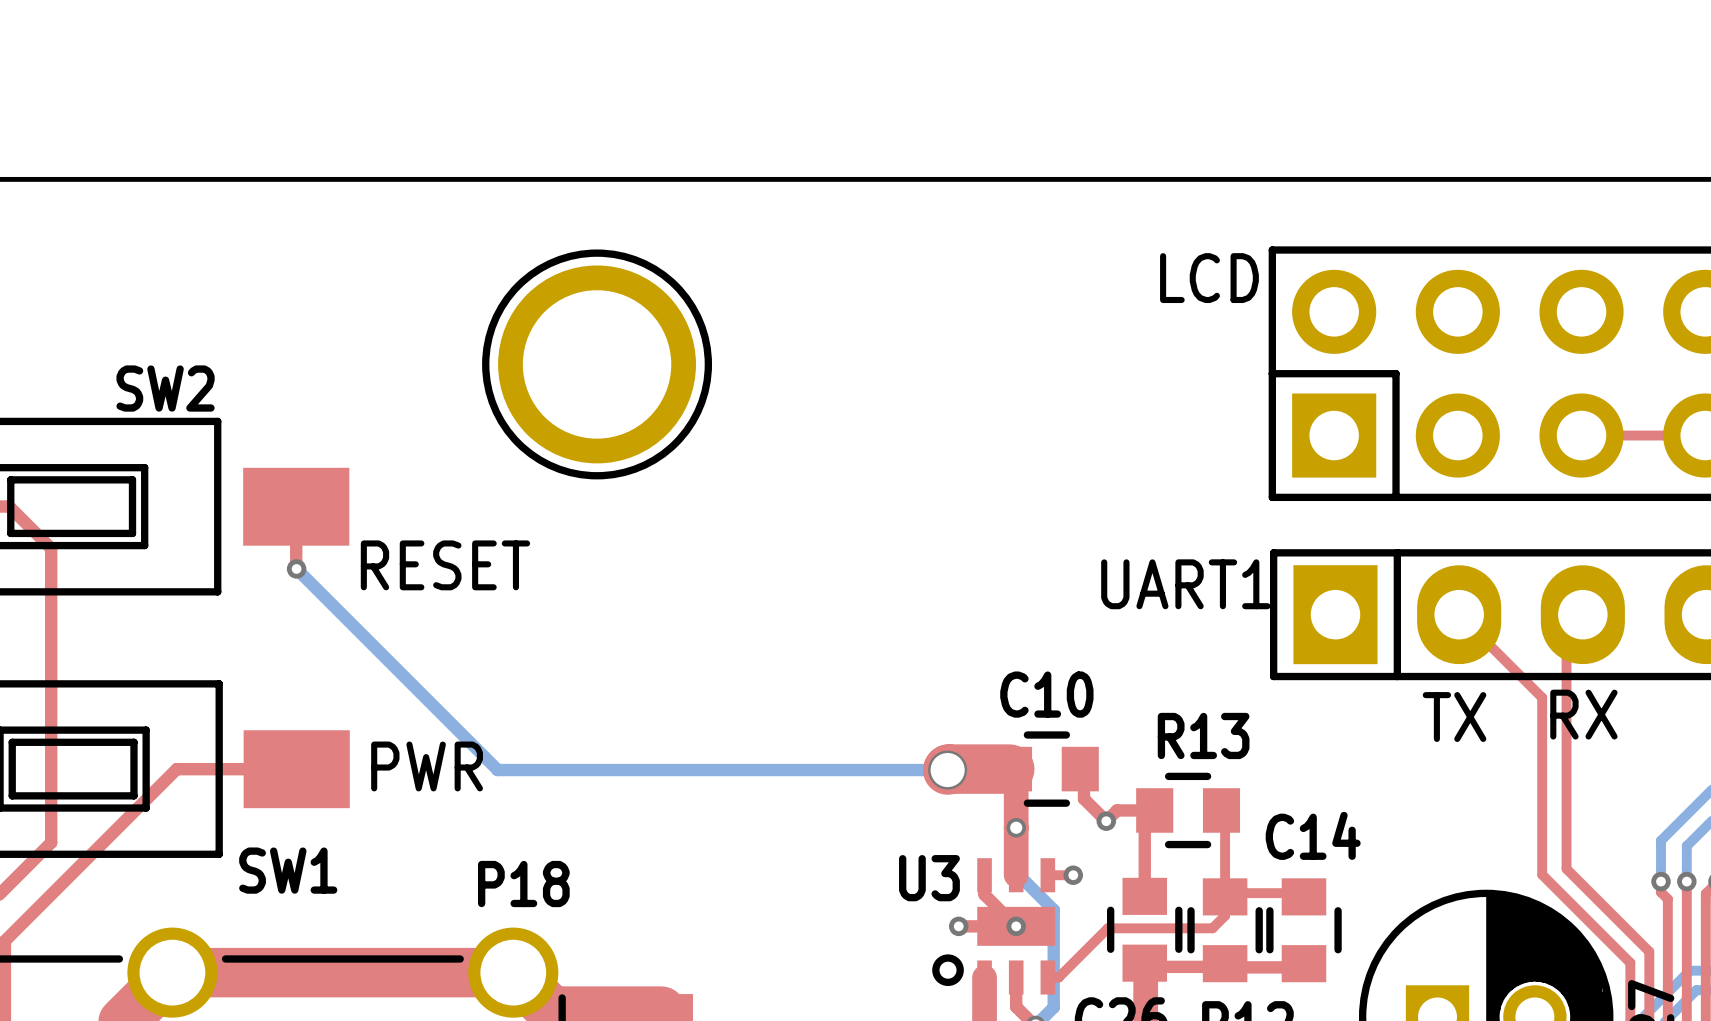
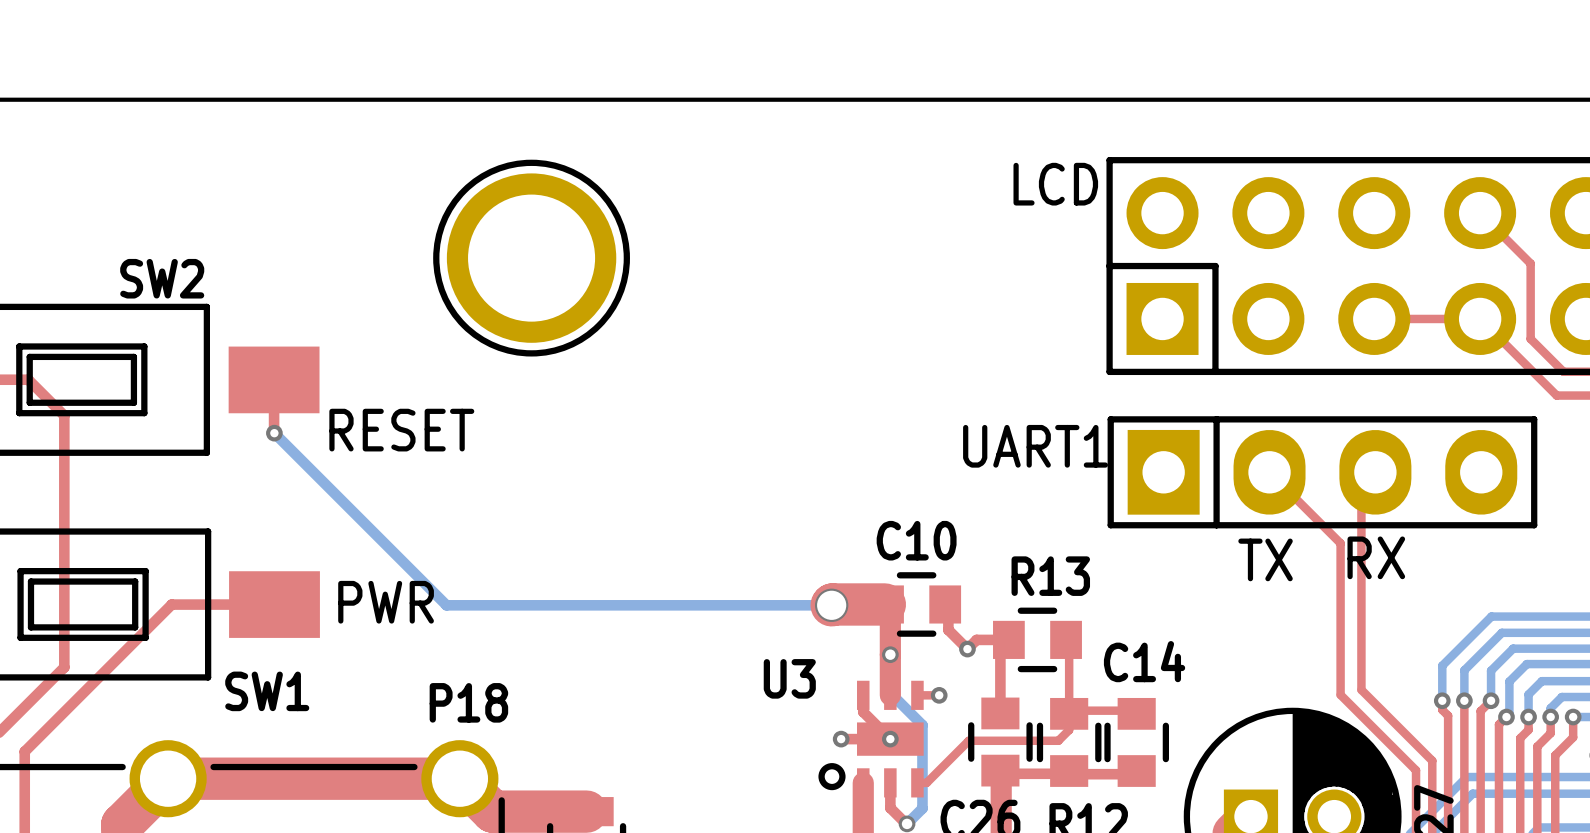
U3 name position: U3 (929, 878) -> U3 (789, 678)

